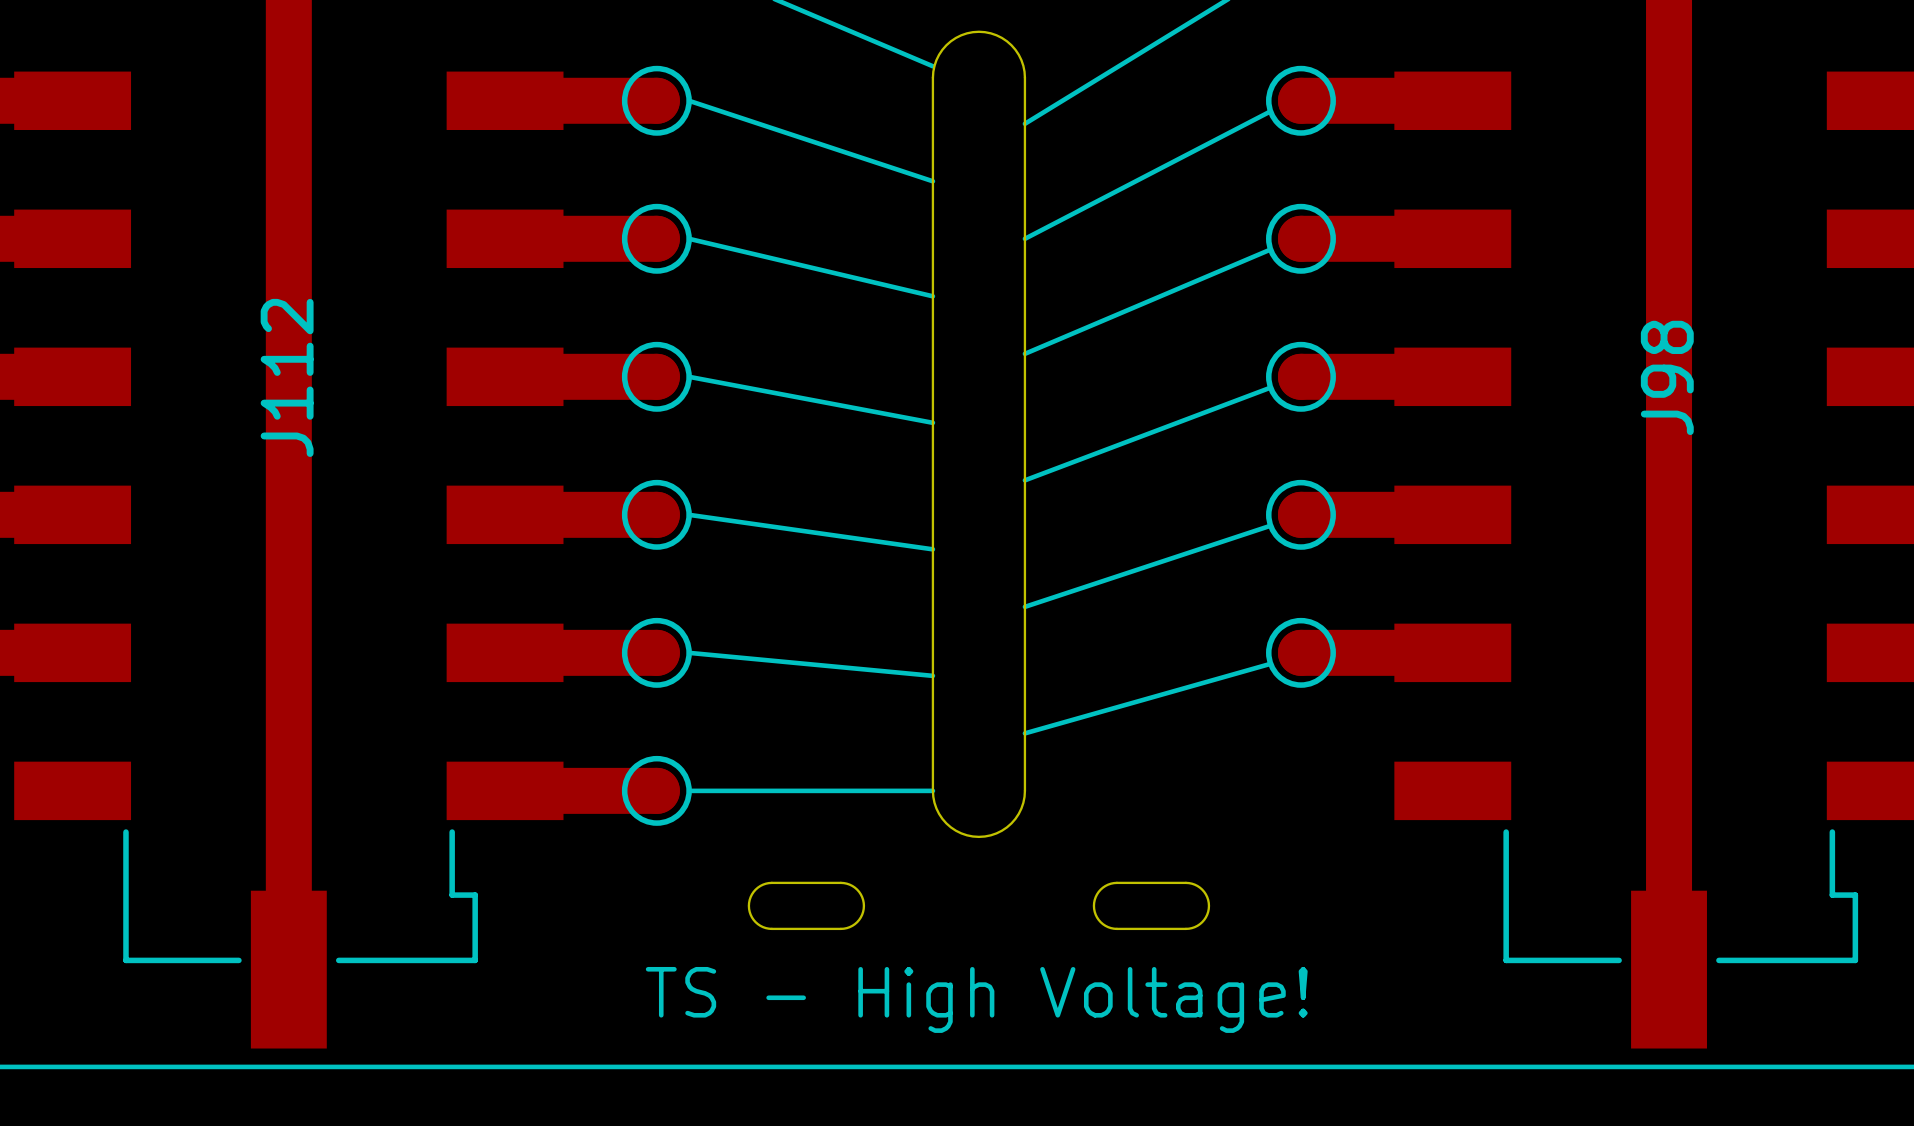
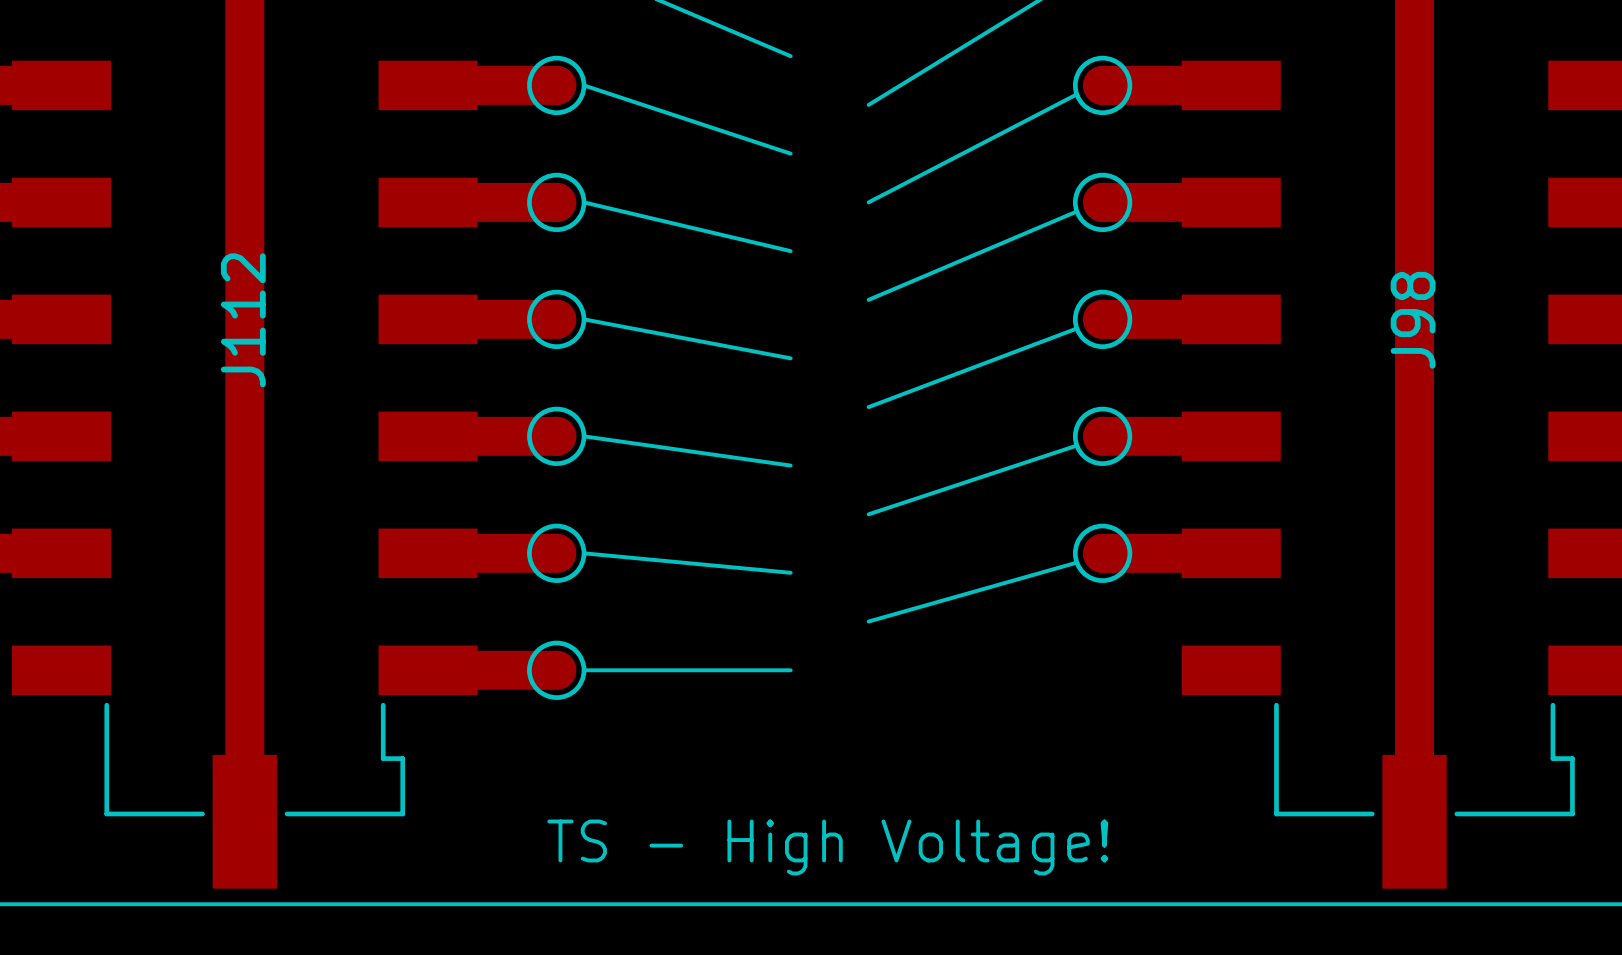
board edge: (932, 77) (932, 790) (936, 808) (946, 823) (961, 833) (978, 836) (996, 833) (1011, 823) (1021, 808) (1024, 790) (1024, 77) (1021, 60) (1011, 45) (996, 35) (978, 31) (961, 35) (946, 45) (936, 60) (932, 77) -> none
board edge: (771, 882) (846, 883) (854, 887) (860, 894) (863, 902) (863, 911) (857, 922) (843, 928) (765, 928) (753, 919) (749, 911) (749, 902) (755, 889) (763, 884) (771, 882) -> none
board edge: (1116, 882) (1191, 883) (1199, 887) (1205, 894) (1208, 902) (1208, 911) (1202, 922) (1188, 928) (1110, 928) (1098, 919) (1094, 911) (1094, 902) (1100, 889) (1108, 884) (1116, 882) -> none

